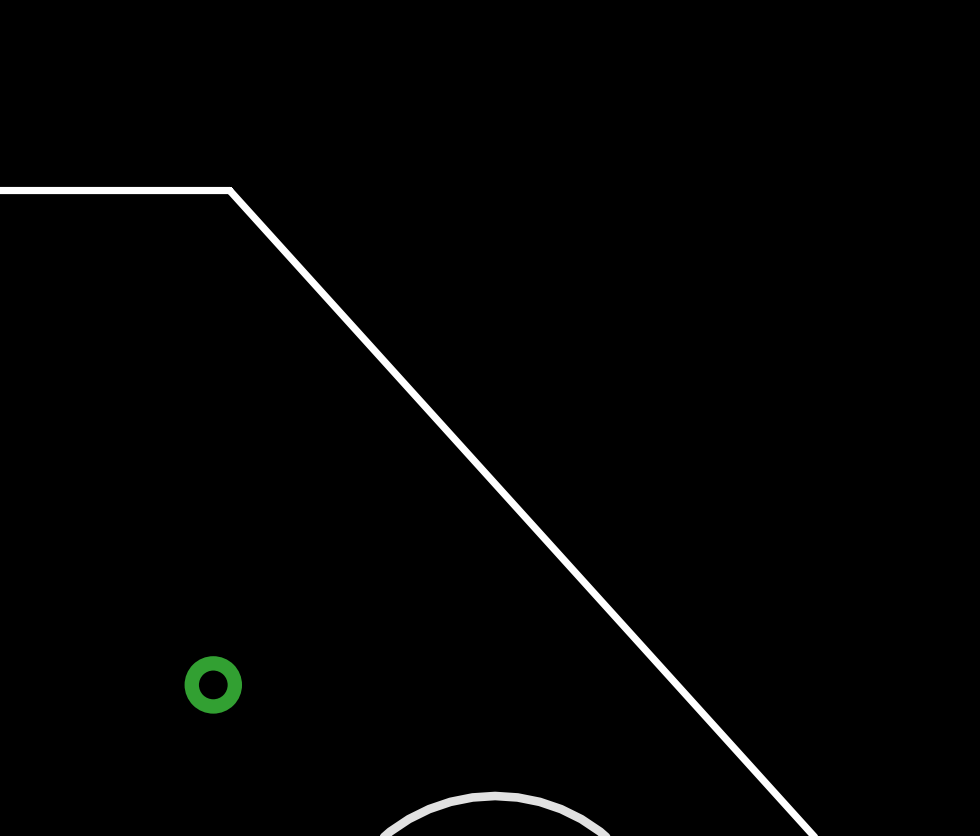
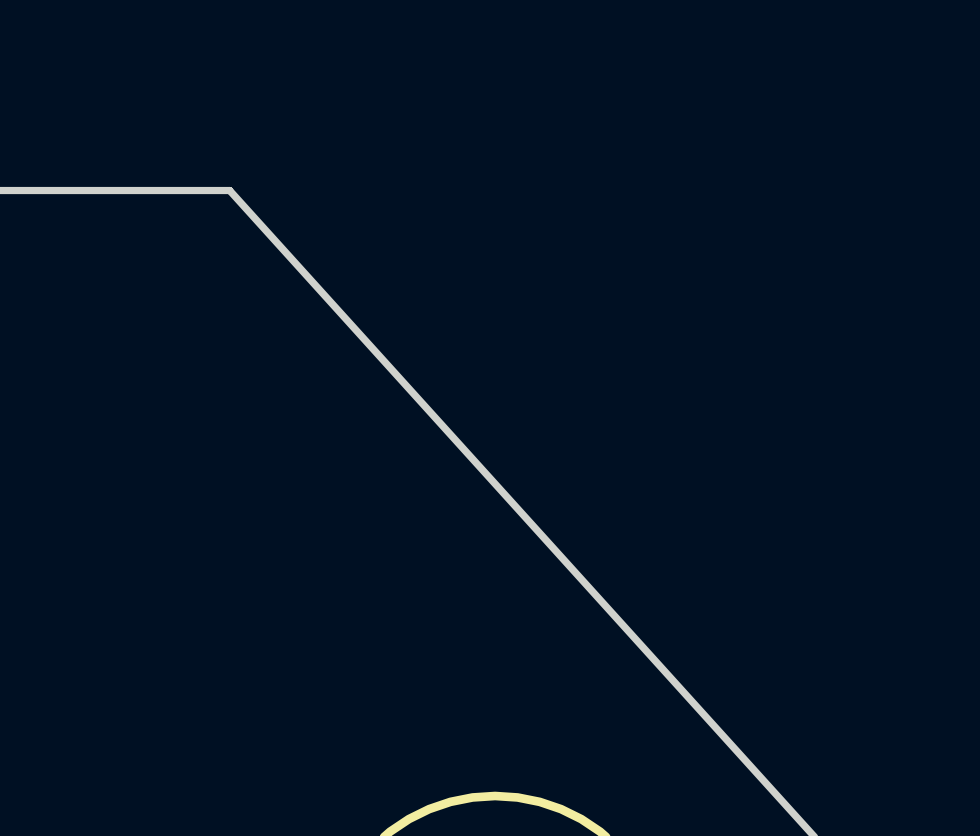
via: (213, 684) -> none

